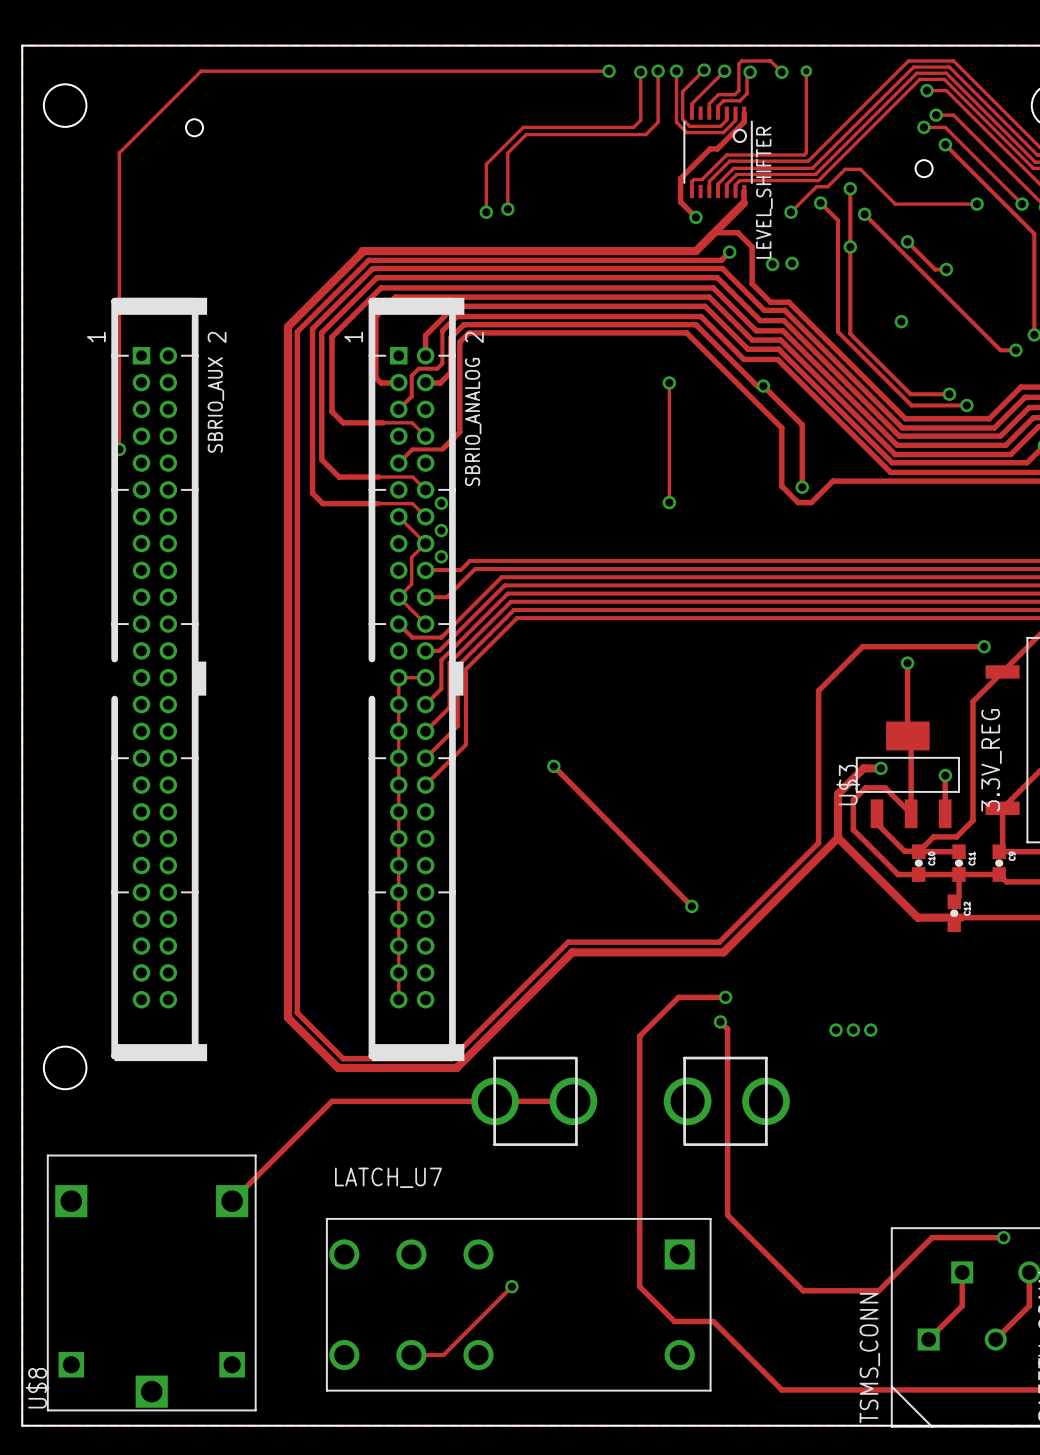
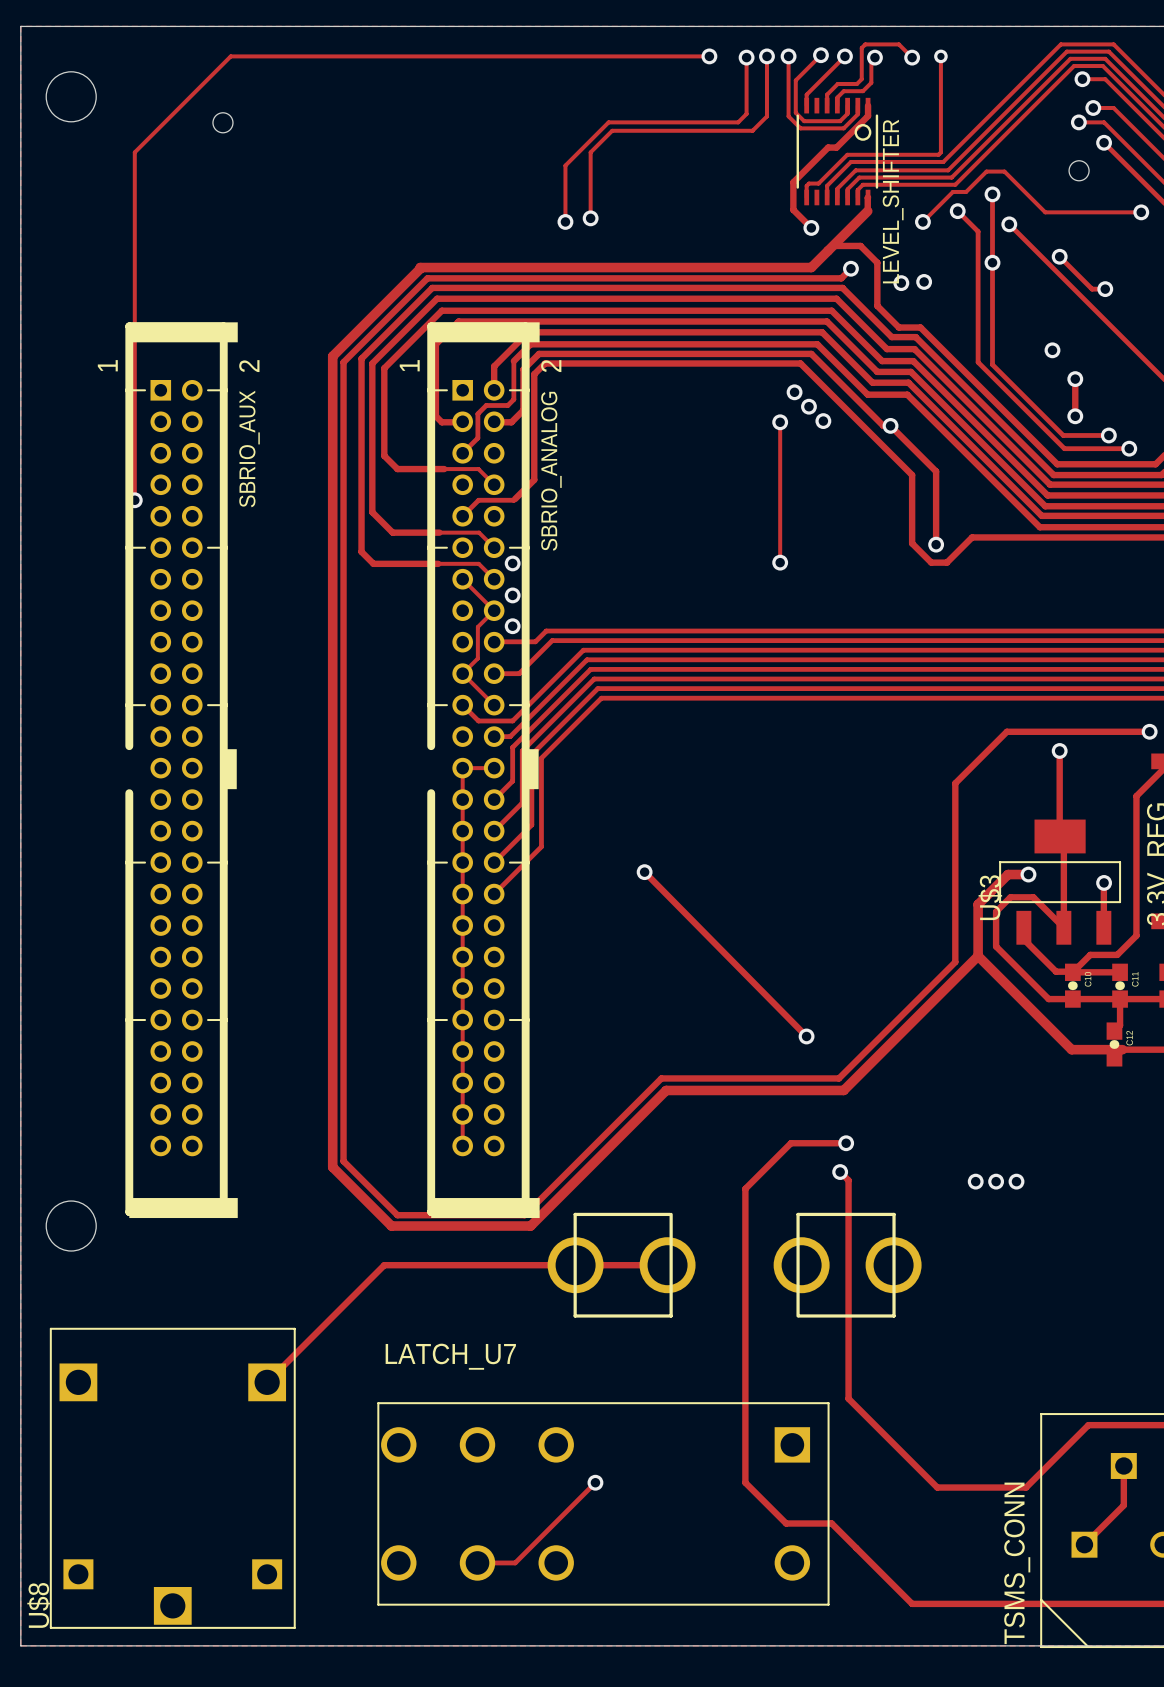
track: none -> (1075, 379) (1075, 416)
via: none -> (1075, 379)
via: none -> (794, 392)
via: none -> (808, 406)
via: none -> (1075, 416)
via: none -> (823, 421)

